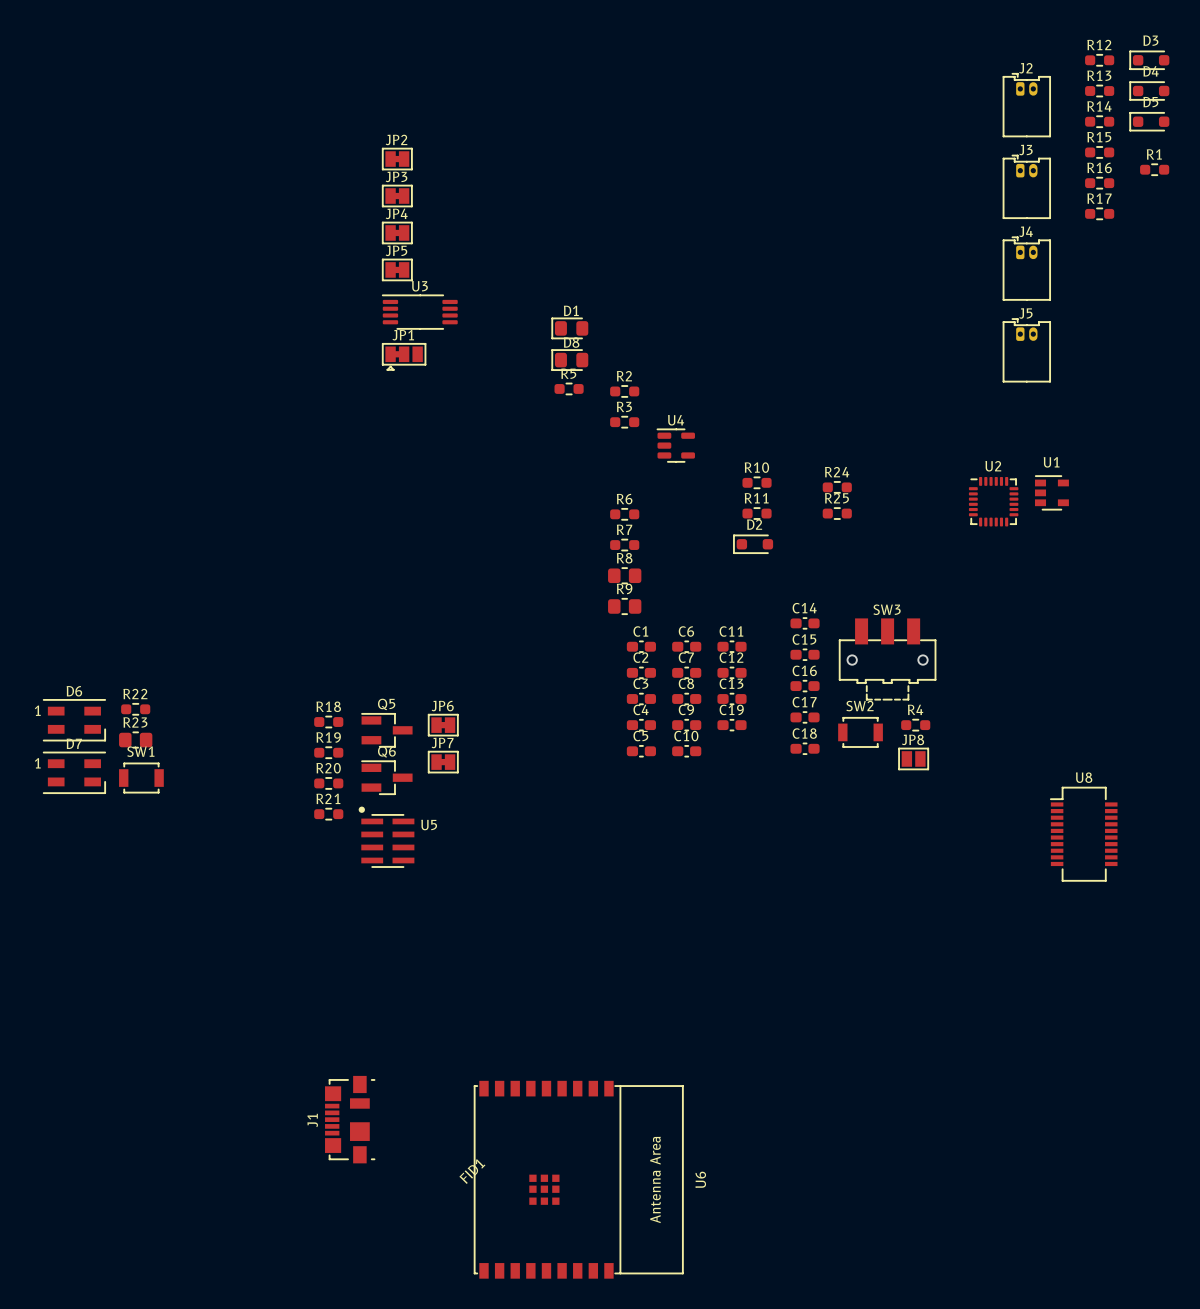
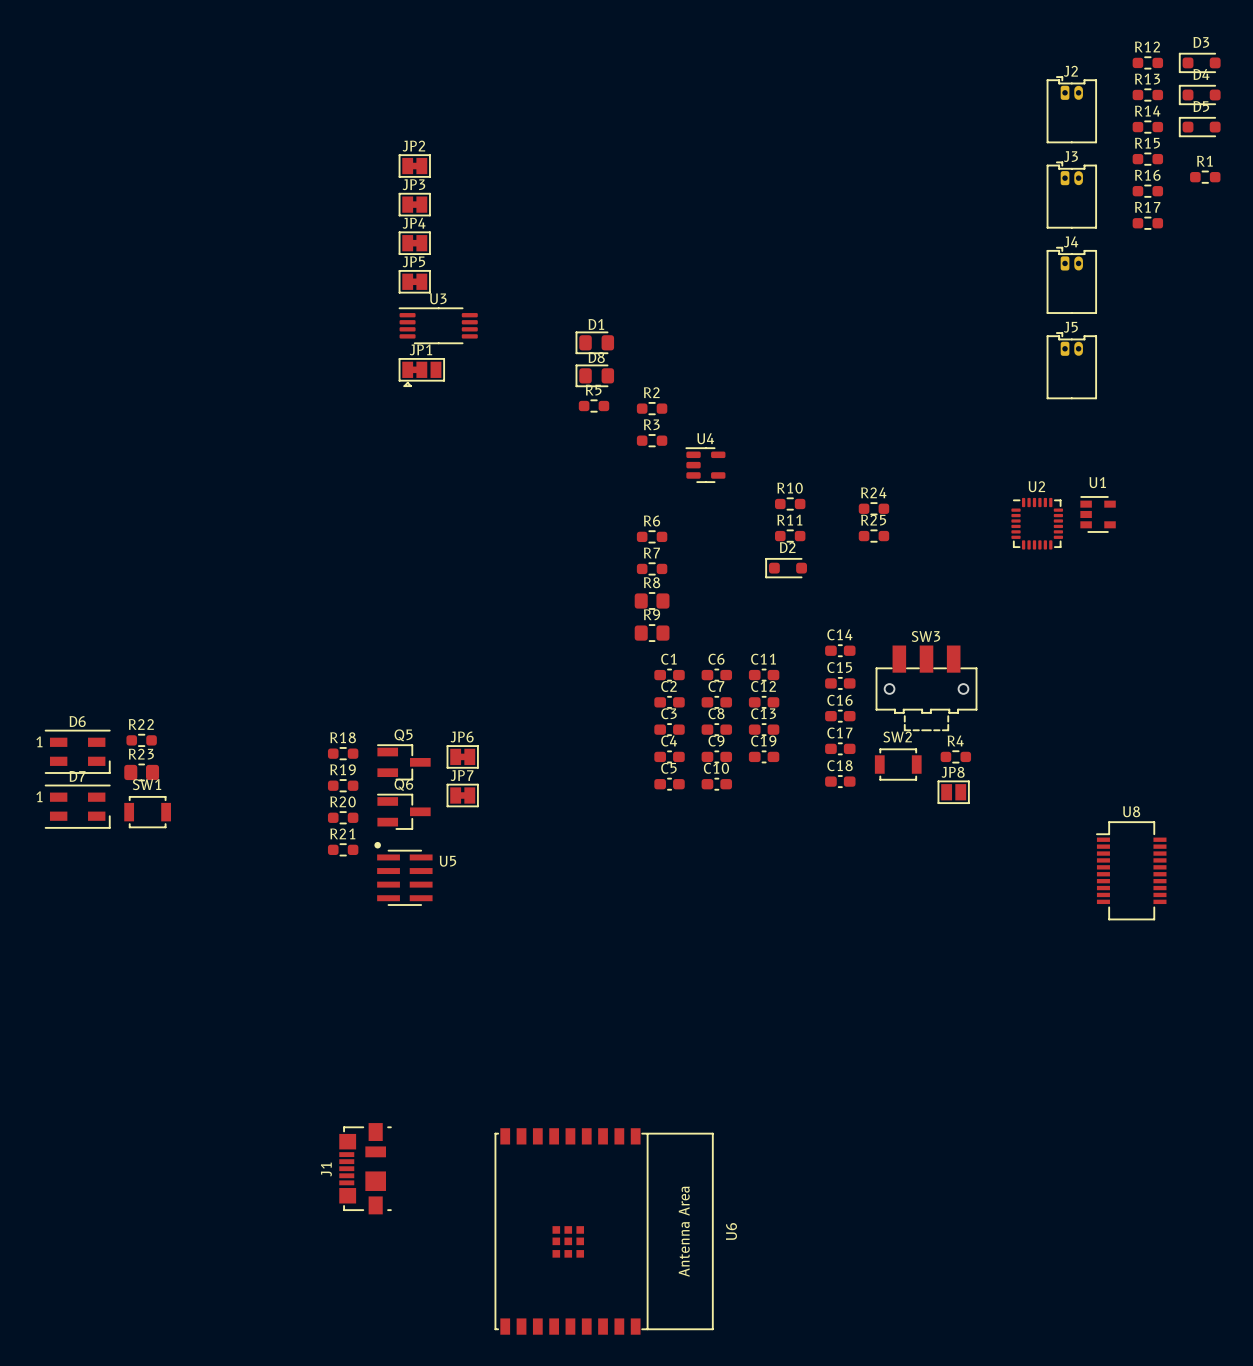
FID1: (472, 1171) -> none

